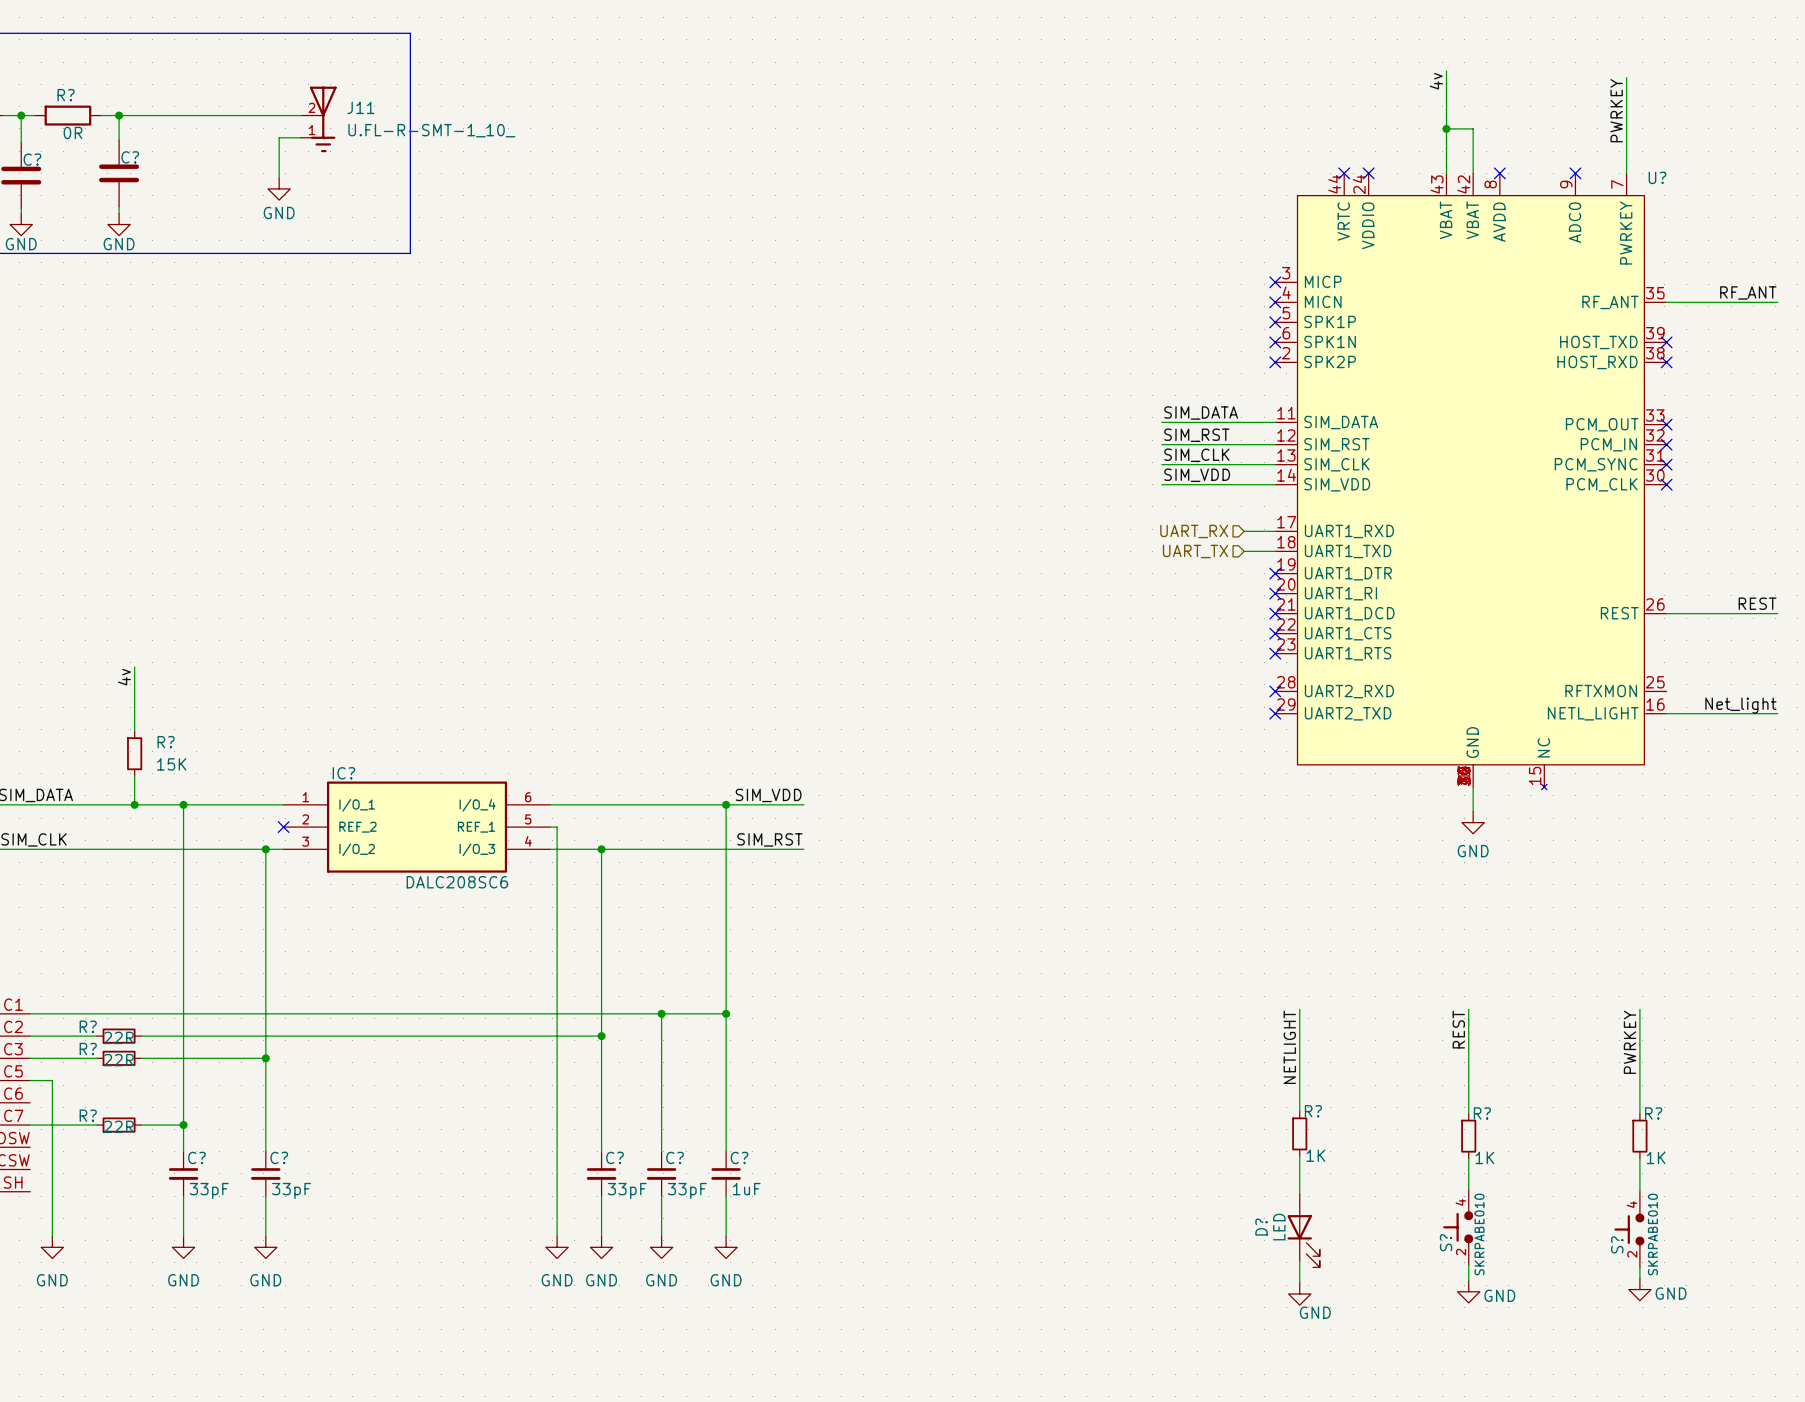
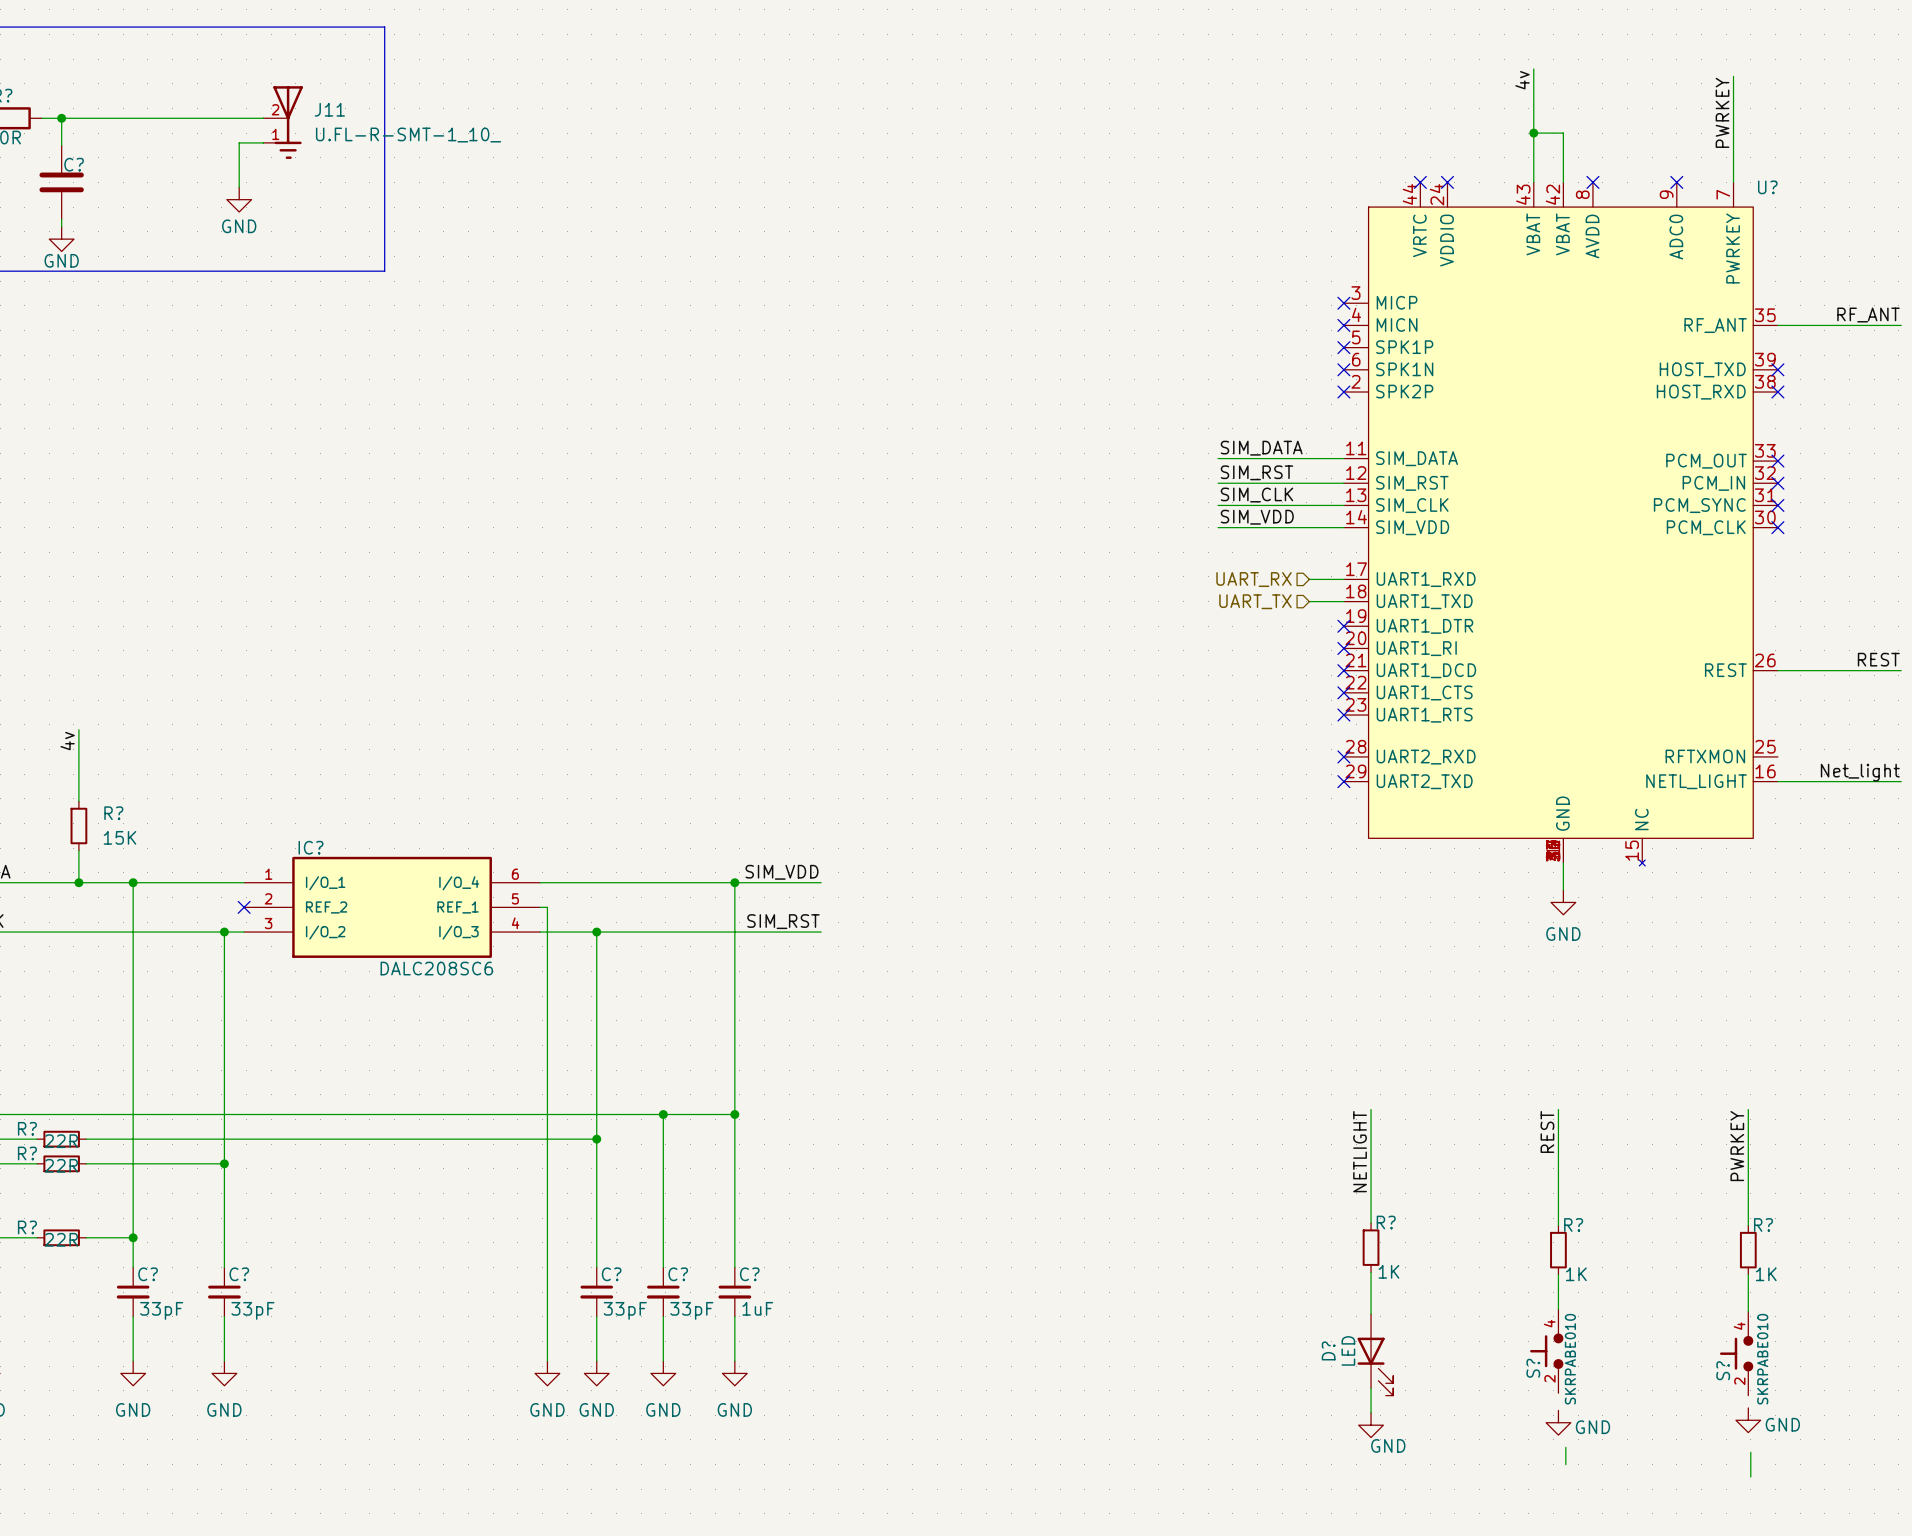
wire: (1468, 1265) (1468, 1280) -> (1565, 1447) (1565, 1464)
wire: (1639, 1267) (1639, 1278) -> none
wire: none -> (1750, 1452) (1750, 1476)

